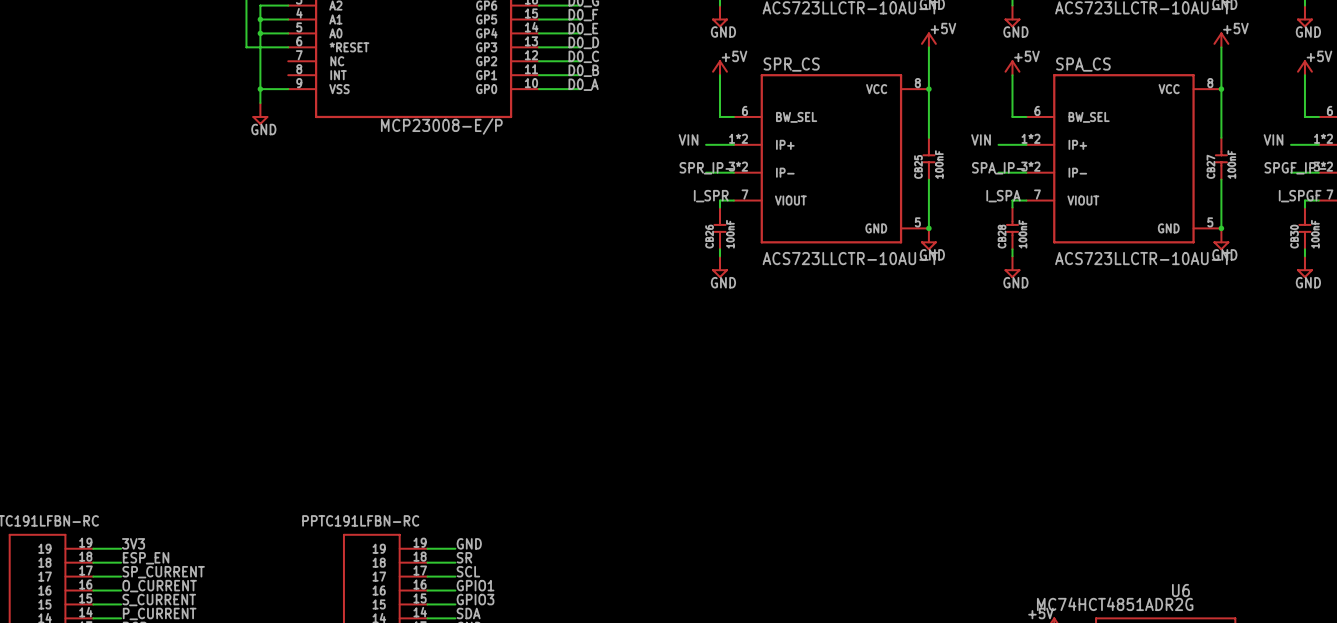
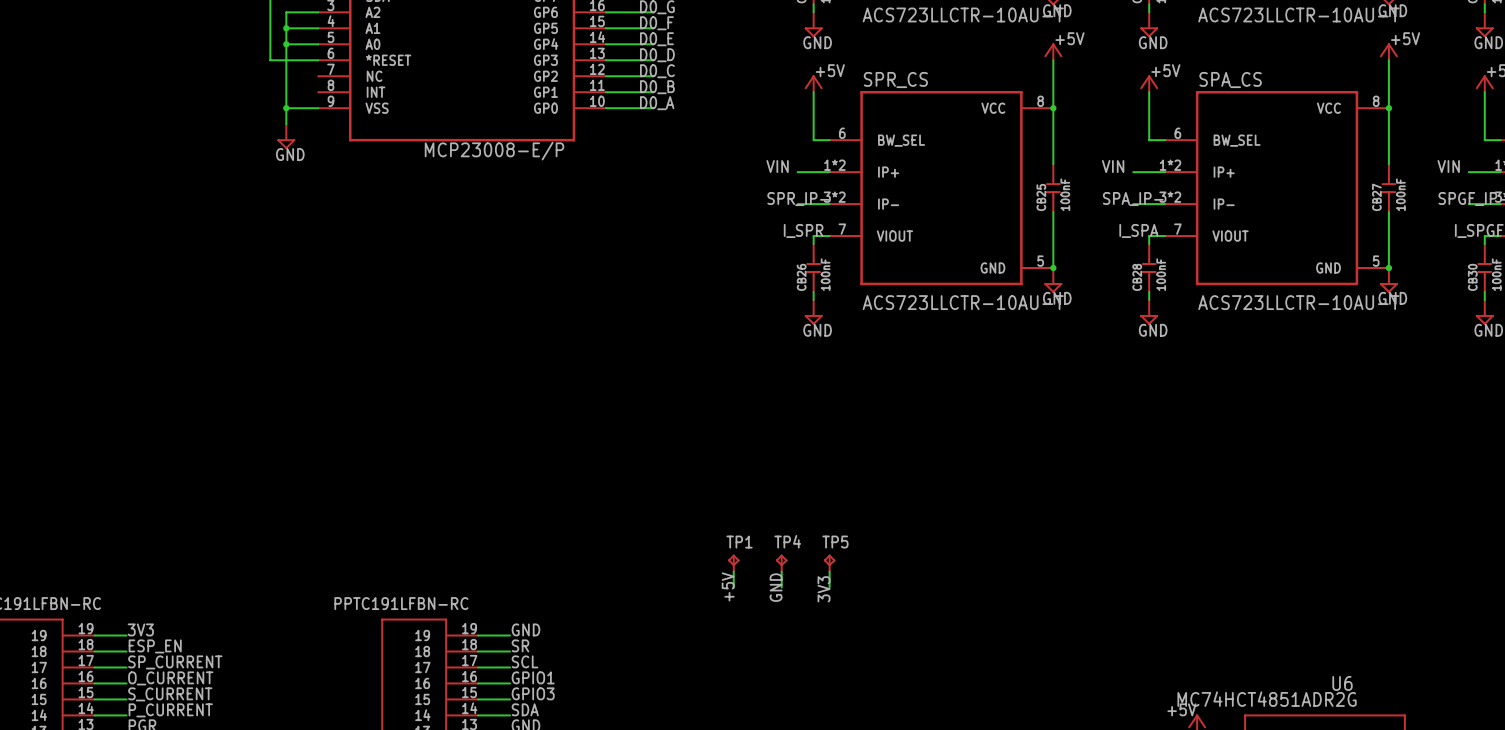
TP1: none -> (733, 563)
TP4: none -> (781, 563)
TP5: none -> (829, 563)
wire: none -> (733, 571) (733, 587)
wire: none -> (781, 571) (781, 587)
wire: none -> (829, 571) (829, 587)
label: none -> +5V (728, 586)
label: none -> GND (776, 587)
label: none -> 3V3 (824, 589)

